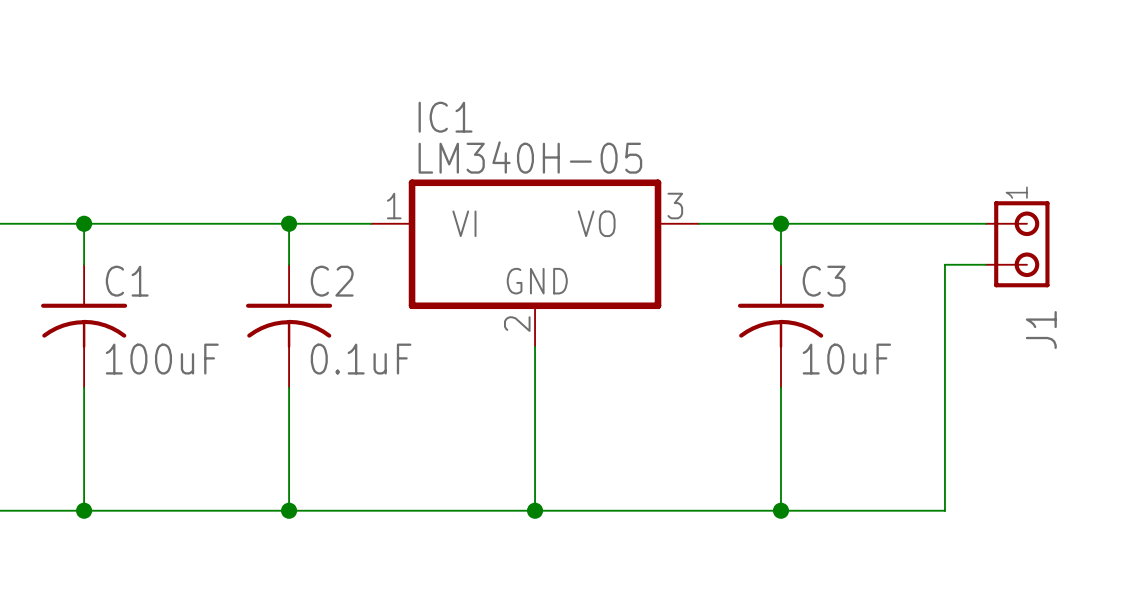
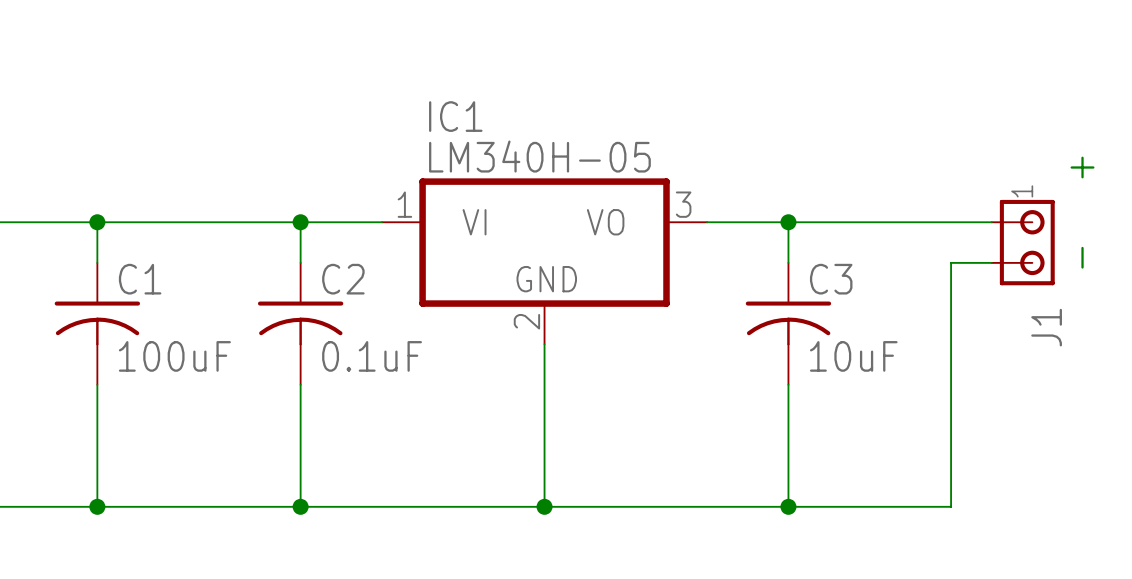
text: none -> - + (1082, 212)

